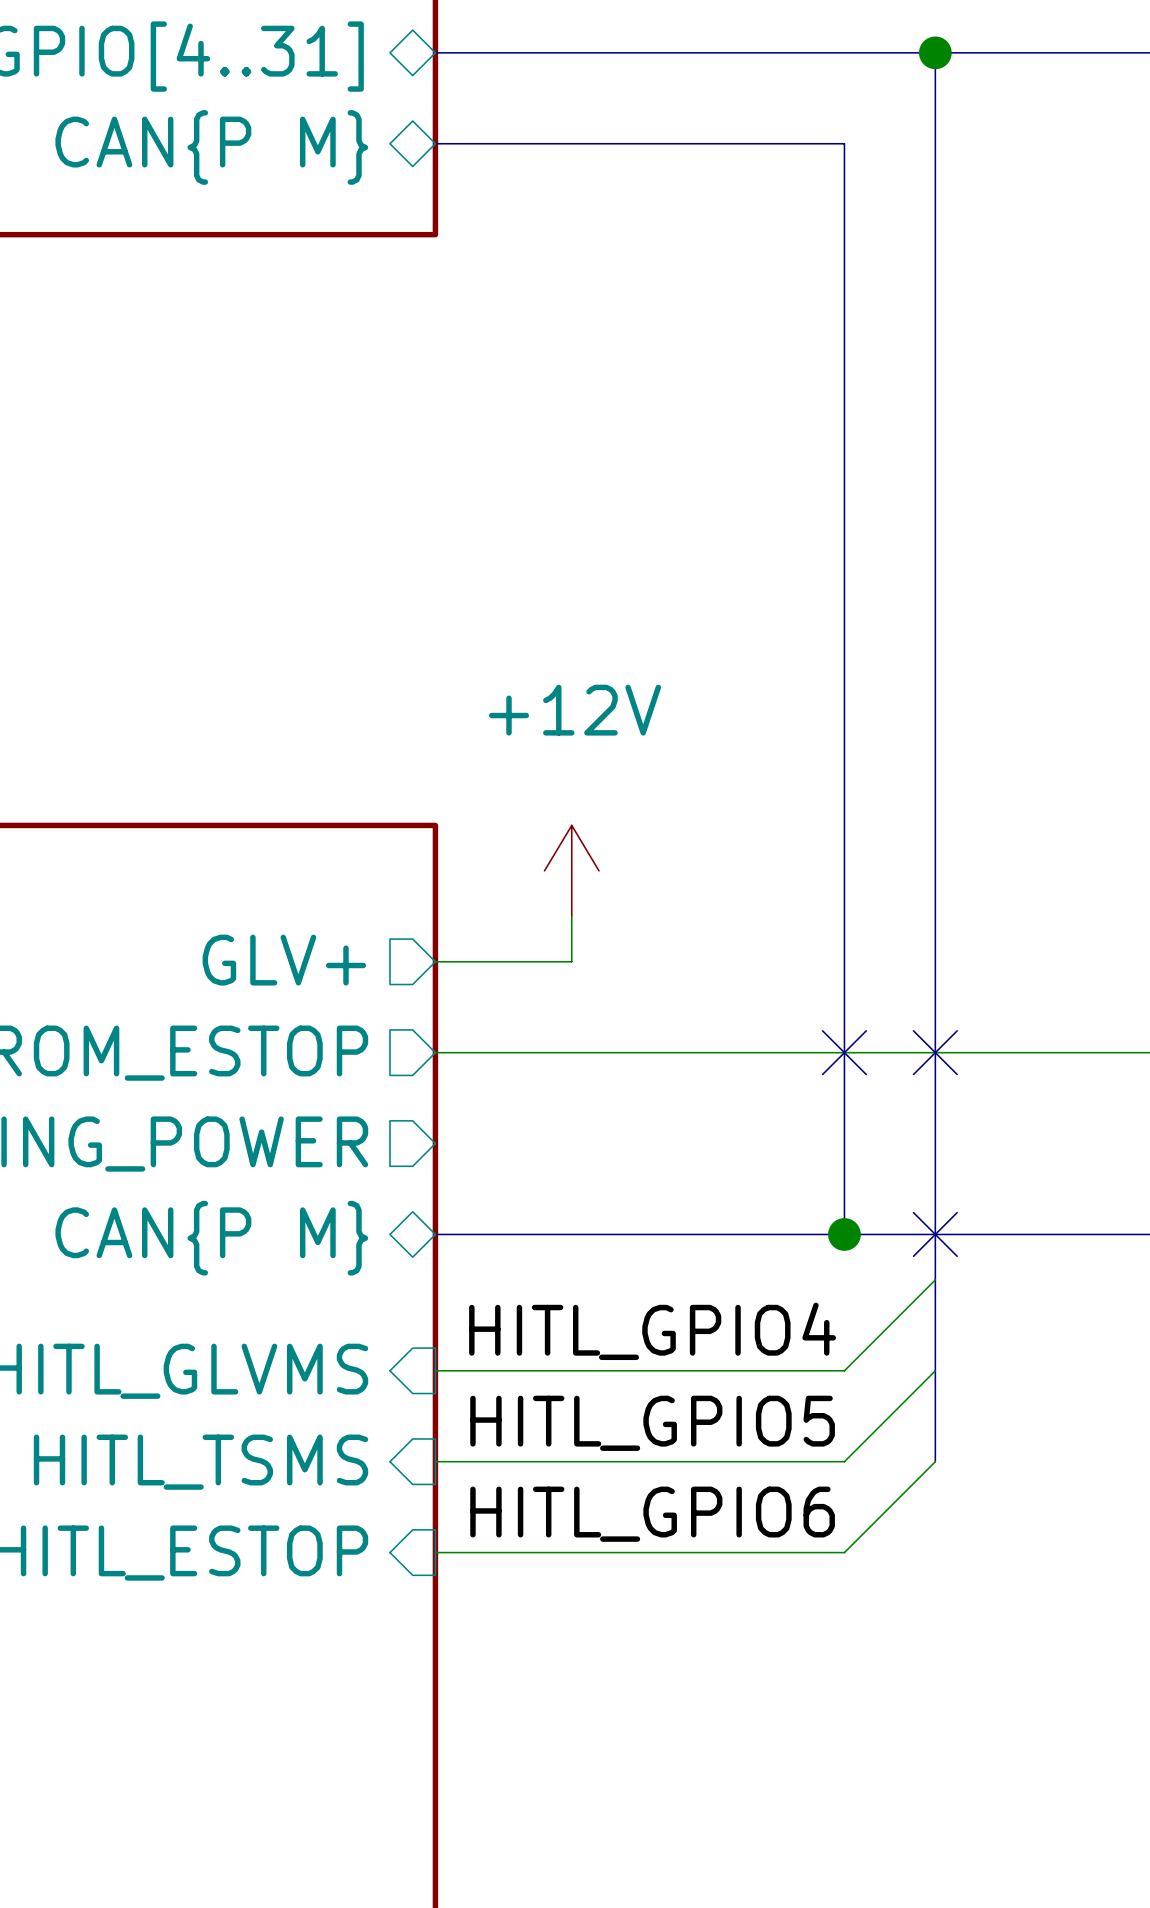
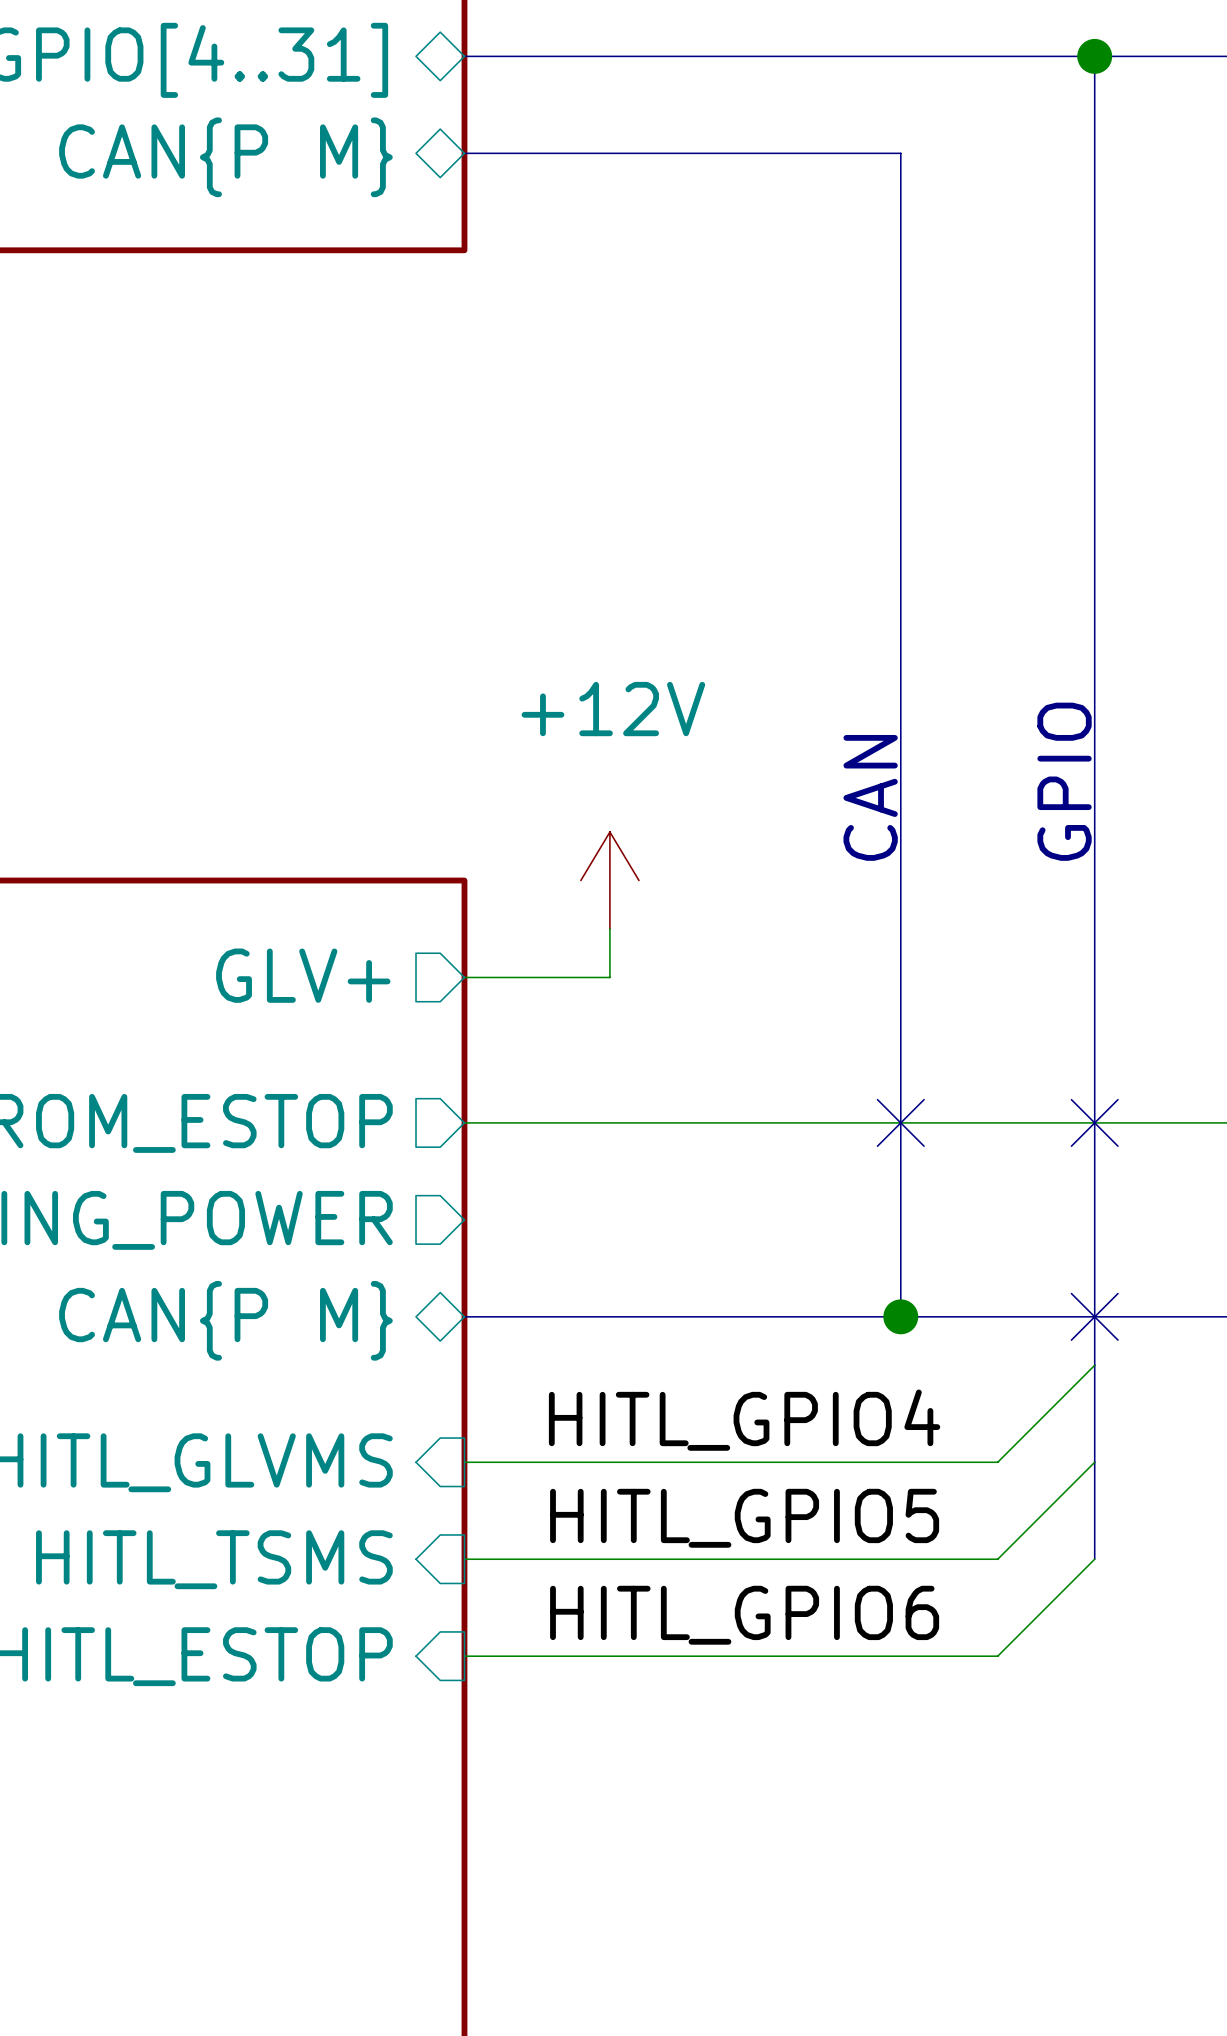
bus: (935, 52) (935, 1461) -> (1094, 56) (1094, 1559)
junction position: (935, 52) -> (1094, 56)
text: none -> GPIO (1064, 781)
text: none -> CAN (870, 797)
power symbol position: +12V (571, 870) -> +12V (609, 880)
wire: (571, 916) (571, 961) (435, 961) -> (609, 929) (609, 977) (464, 977)
sheet pin position: GLV+ (284, 960) -> GLV+ (303, 975)
no-connect mark position: (935, 1052) -> (1094, 1122)
no-connect mark position: (935, 1234) -> (1094, 1316)
wire: (935, 1279) (844, 1370) -> (1094, 1365) (997, 1462) (900, 1462)
label position: HITL_GPIO4 (652, 1331) -> HITL_GPIO4 (744, 1420)
wire: (935, 1370) (844, 1461) -> (1094, 1462) (997, 1559) (900, 1559)
label position: HITL_GPIO5 (652, 1423) -> HITL_GPIO5 (744, 1518)
wire: (935, 1461) (844, 1552) -> (1094, 1559) (997, 1656) (900, 1656)
label position: HITL_GPIO6 (652, 1514) -> HITL_GPIO6 (744, 1615)

